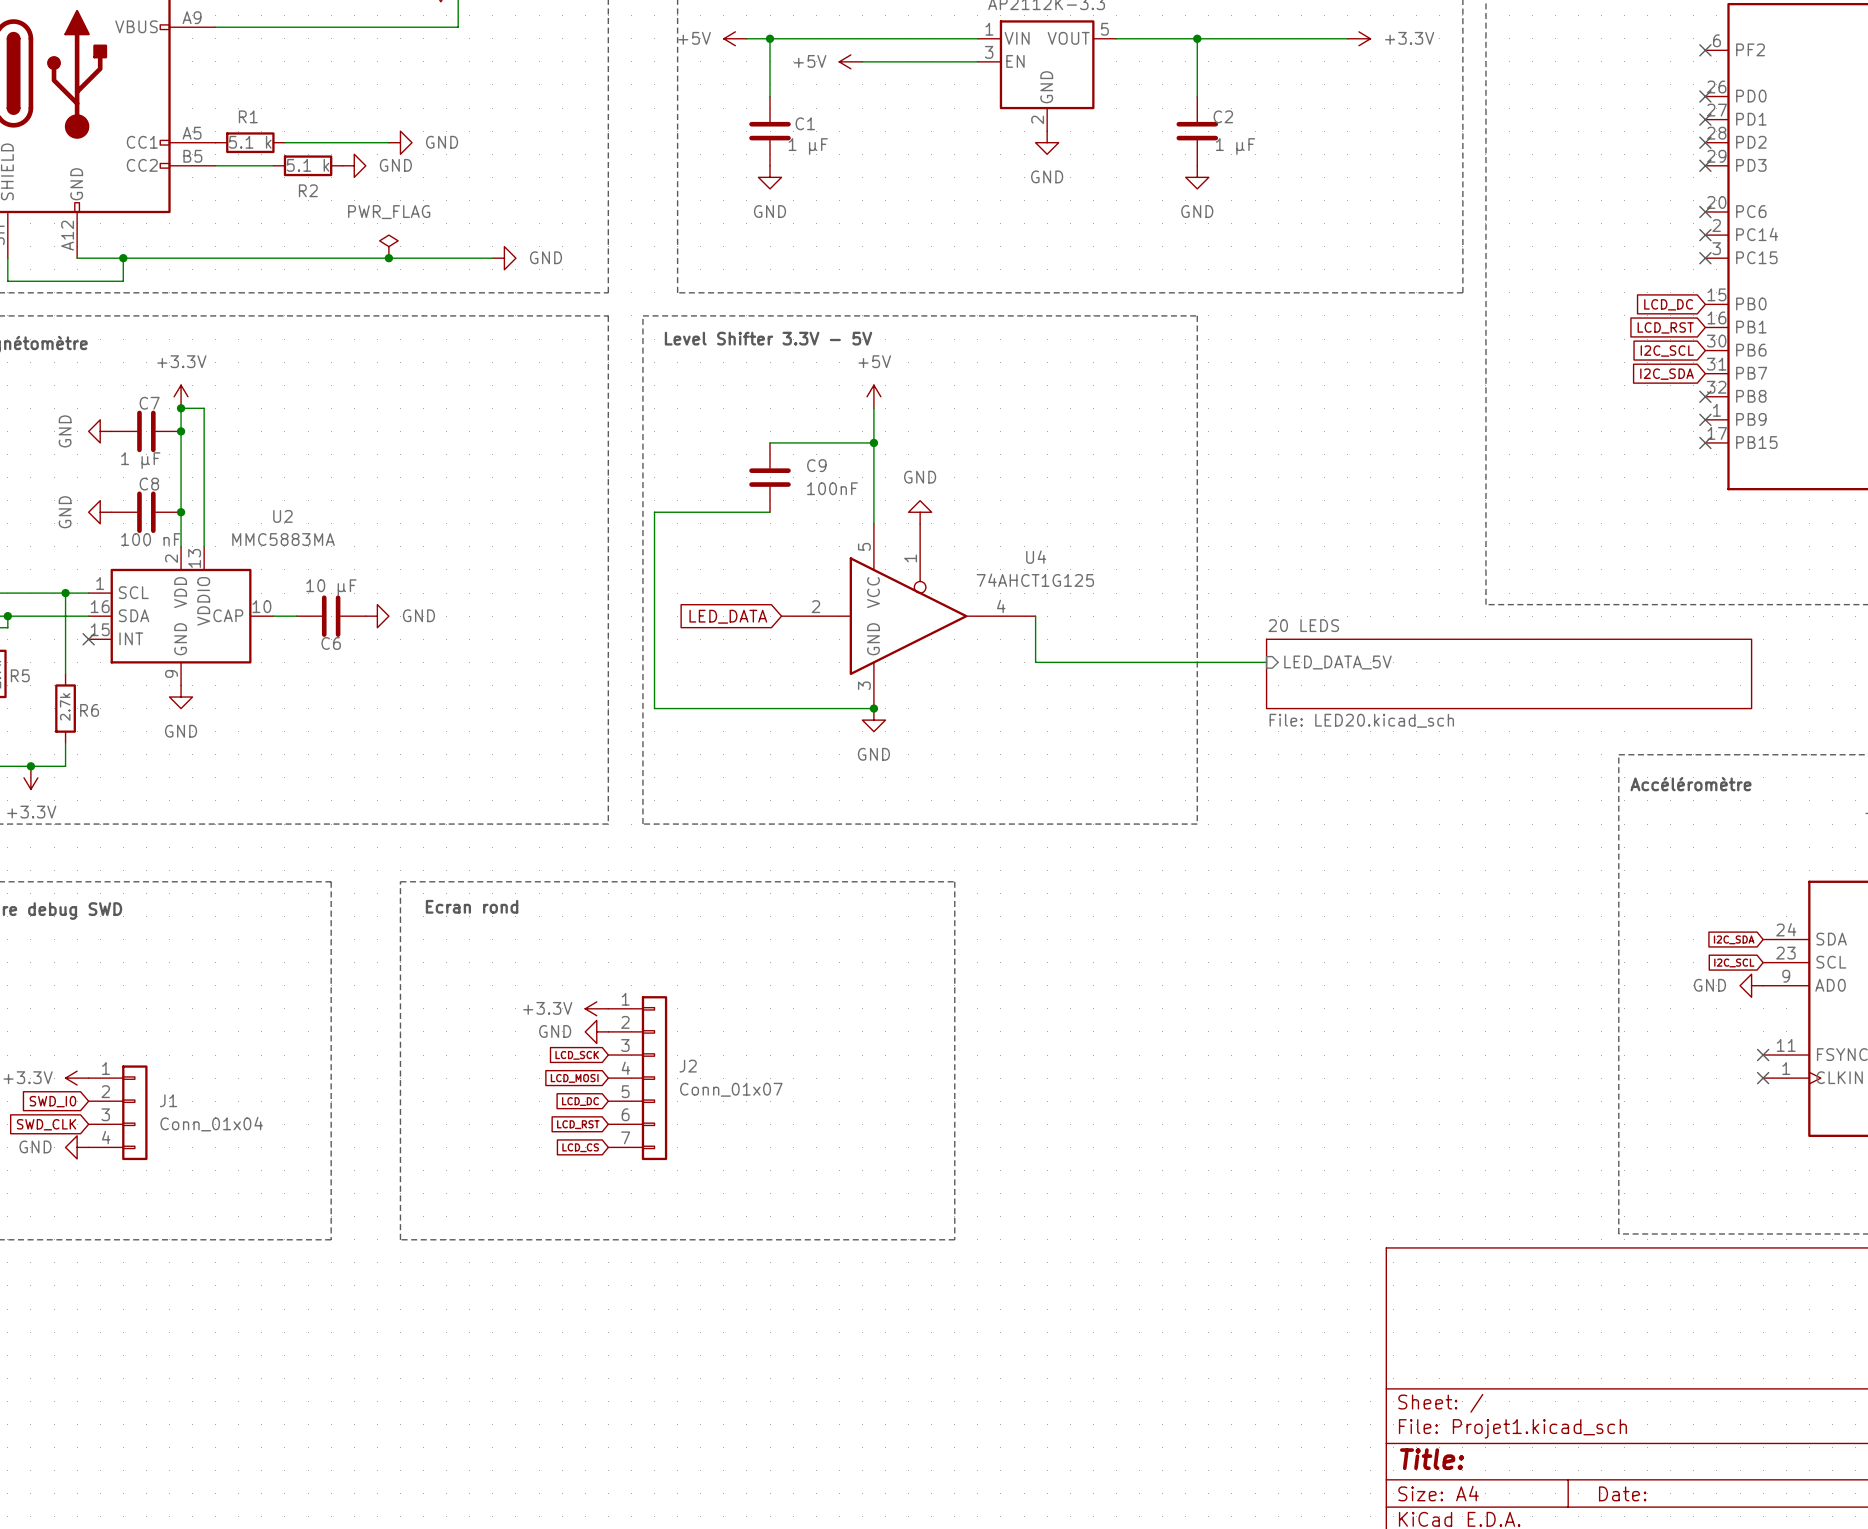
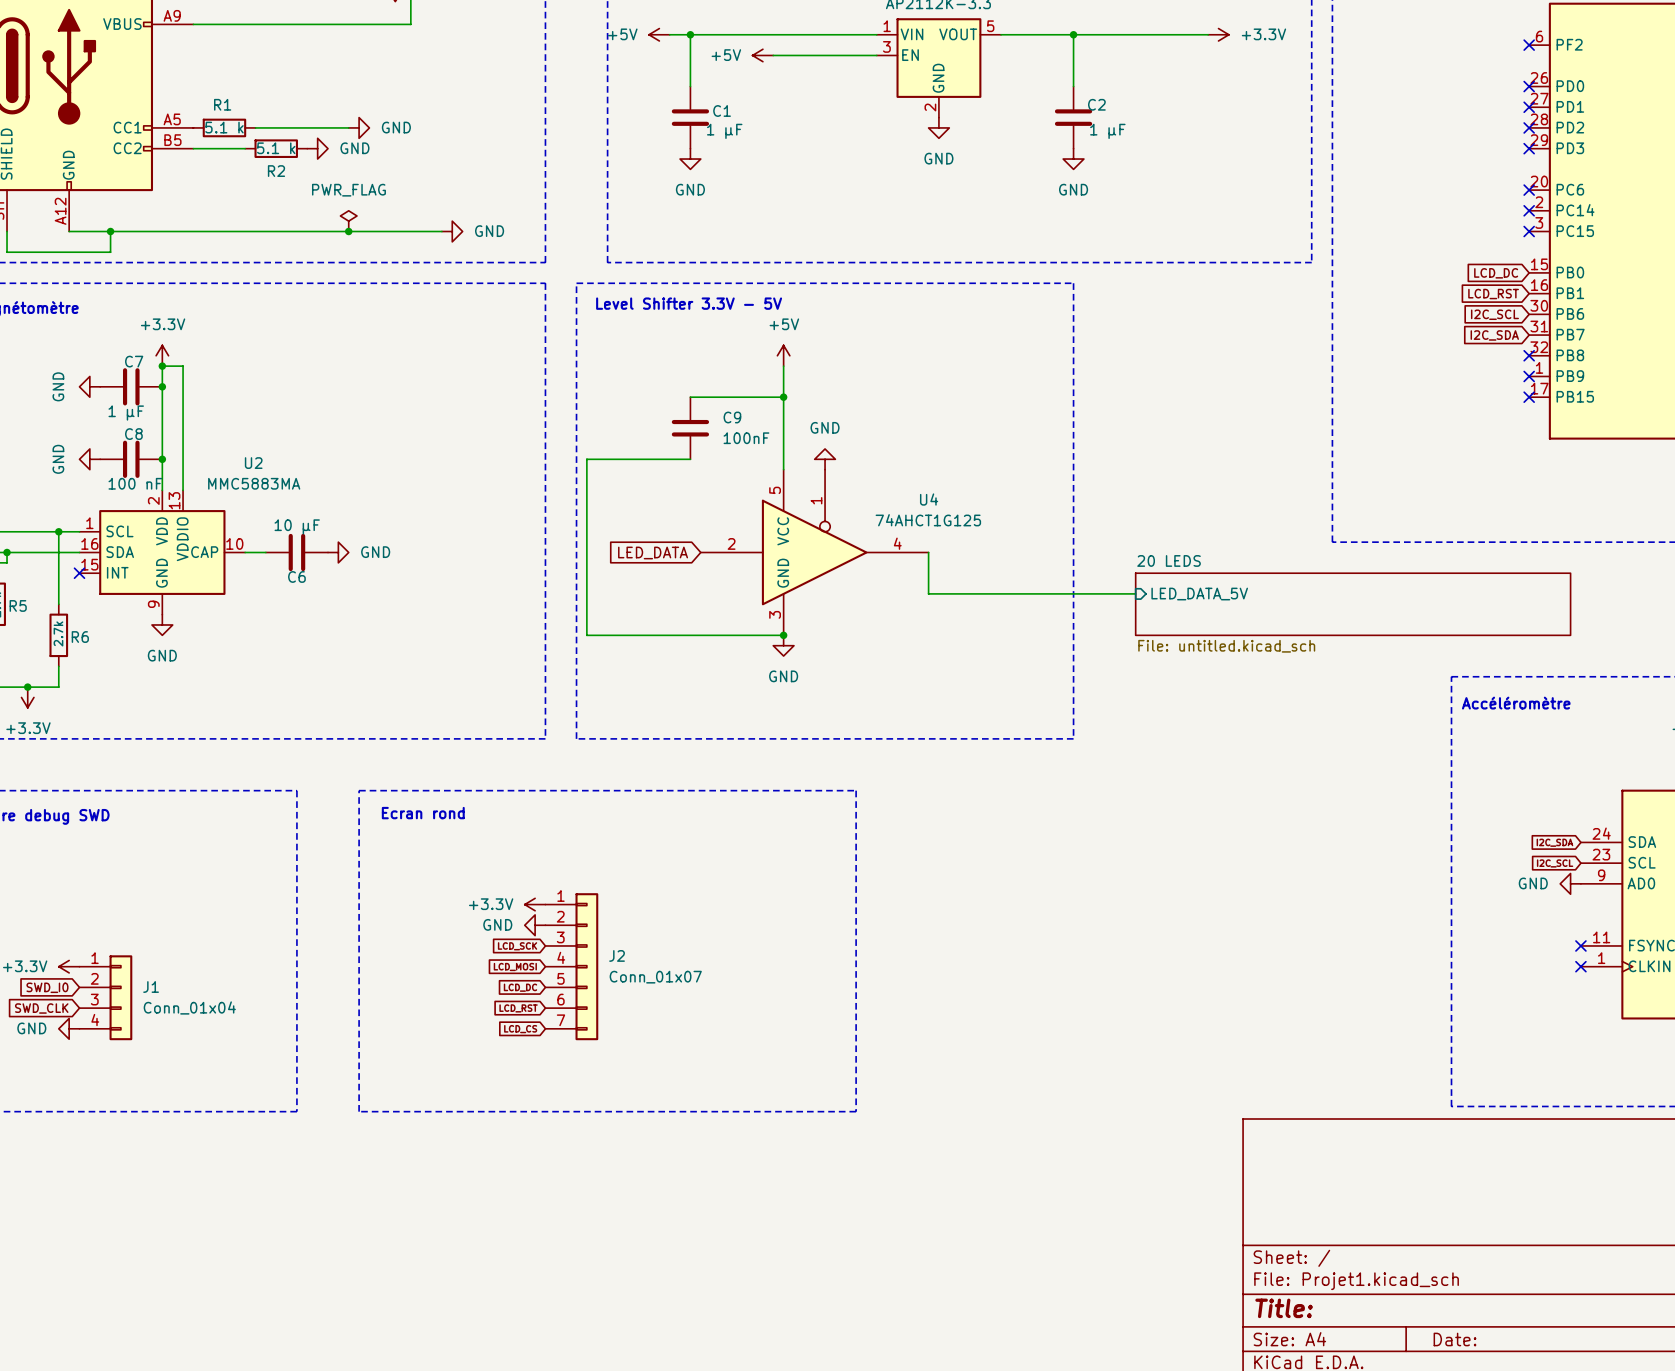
sheet 20 LEDS value: File: LED20.kicad_sch (1361, 720) -> File: untitled.kicad_sch (1226, 646)

